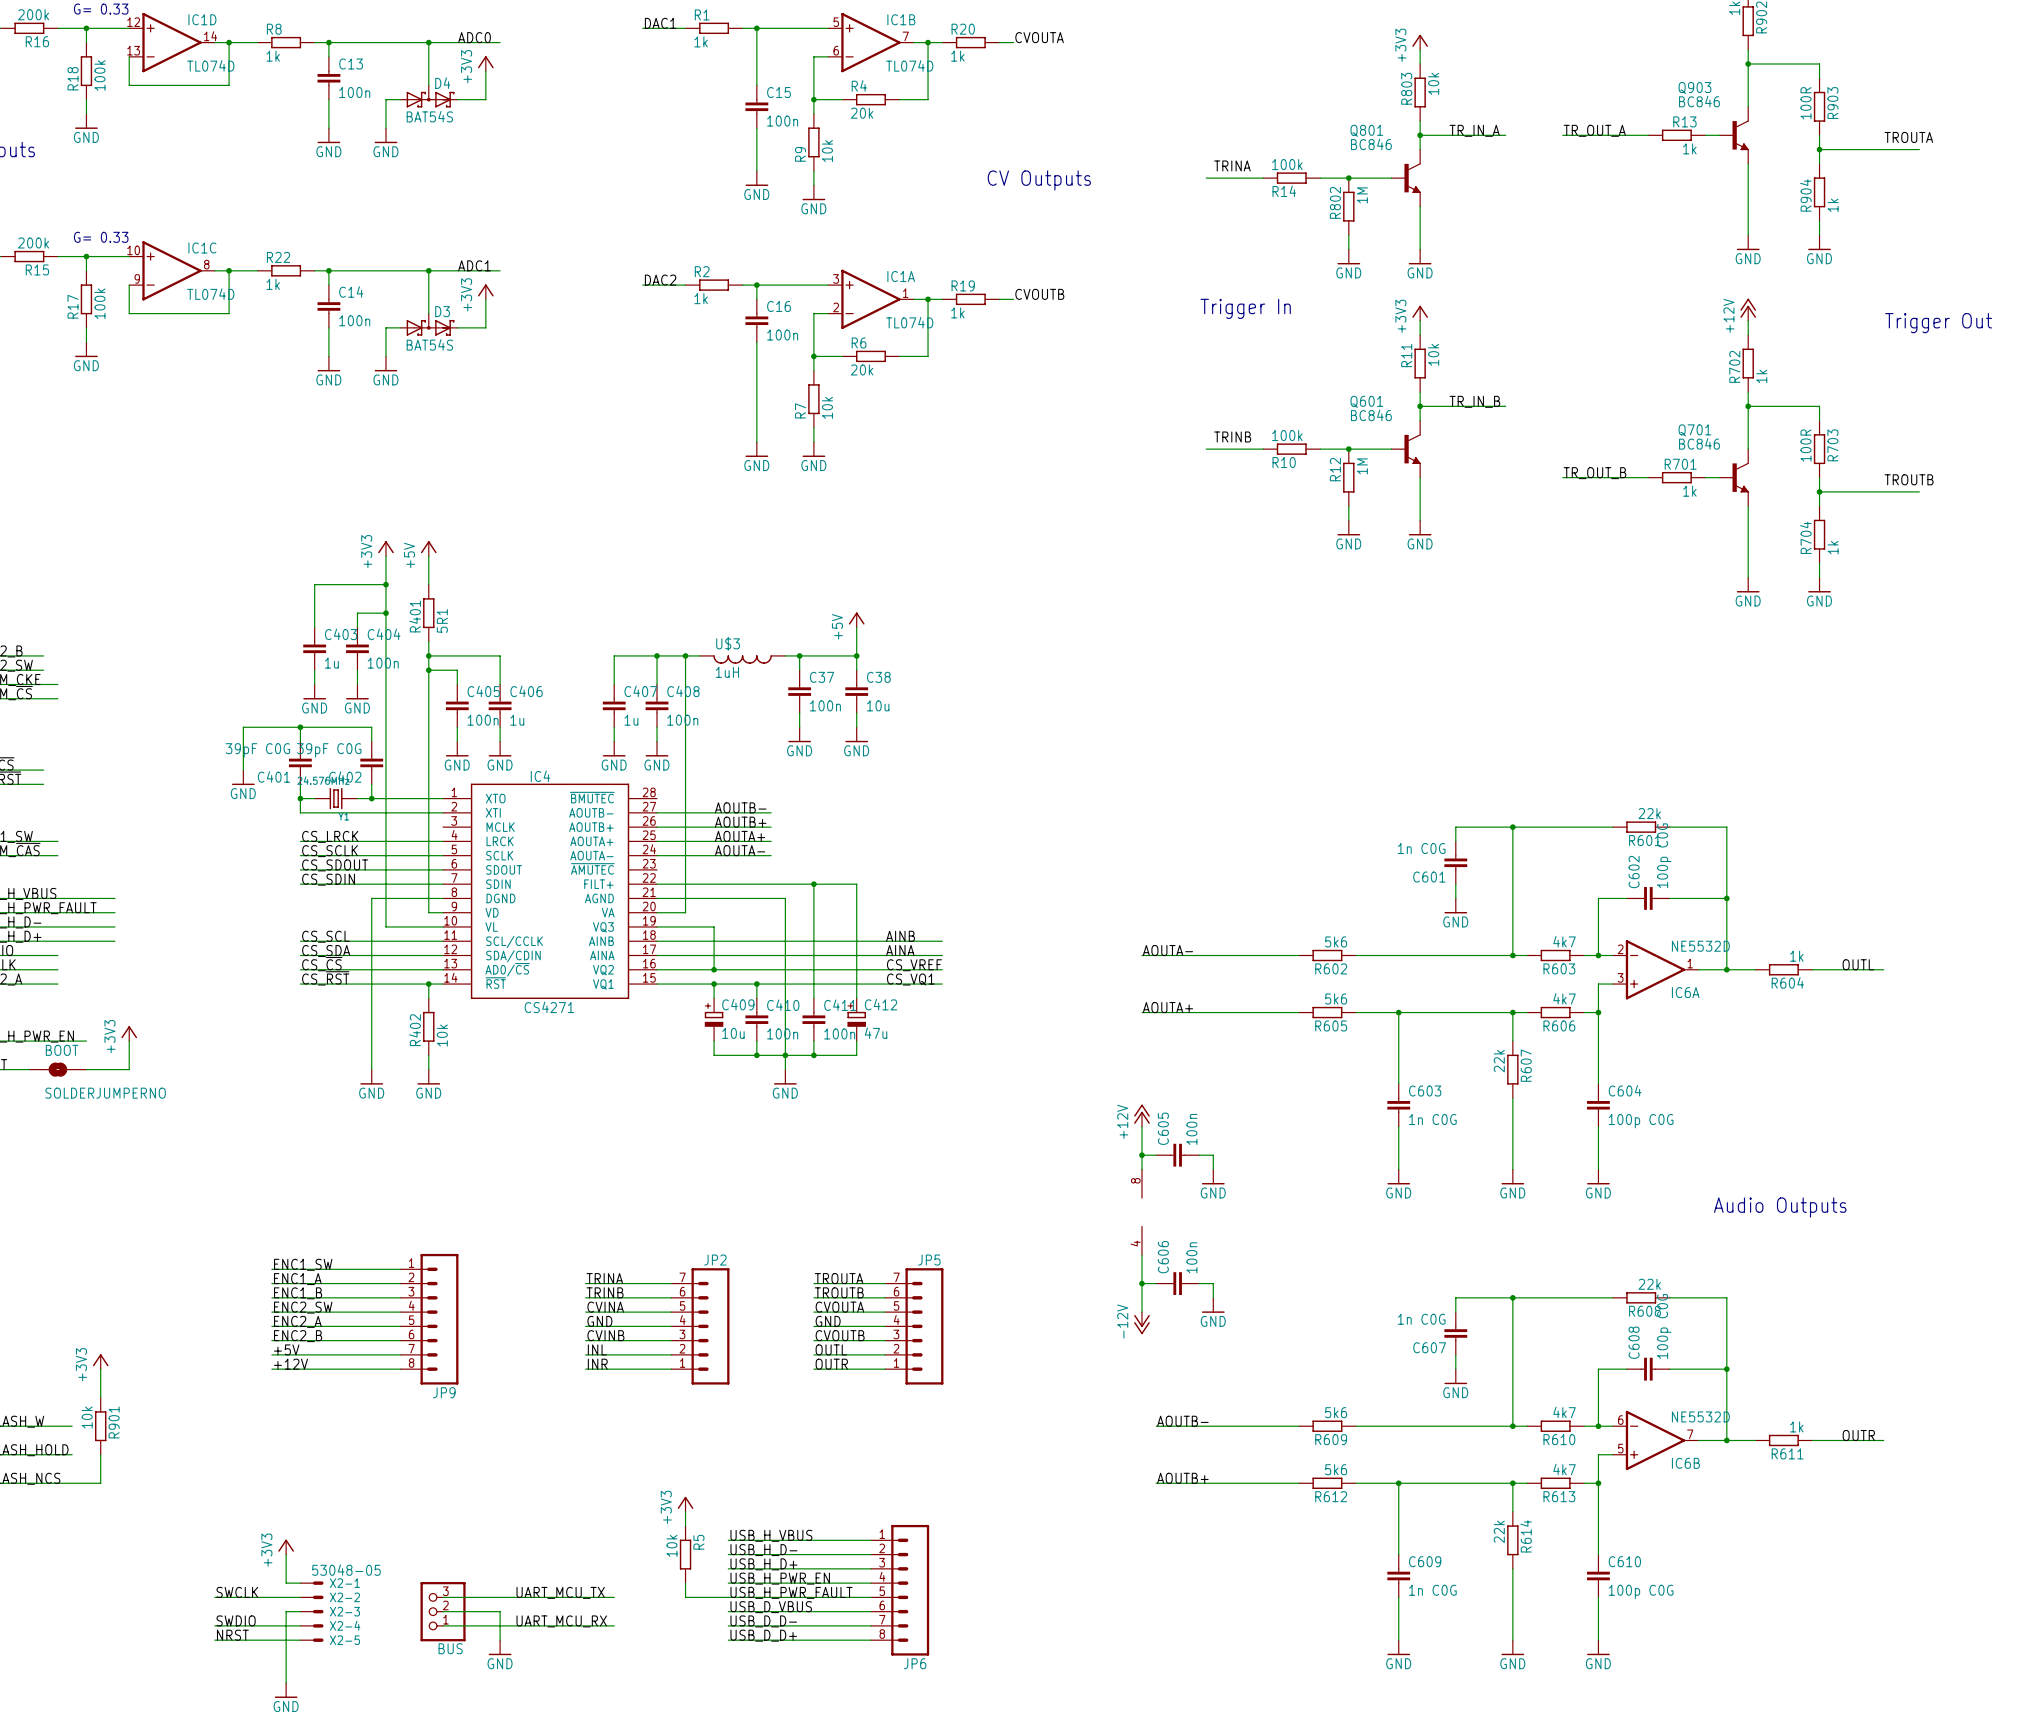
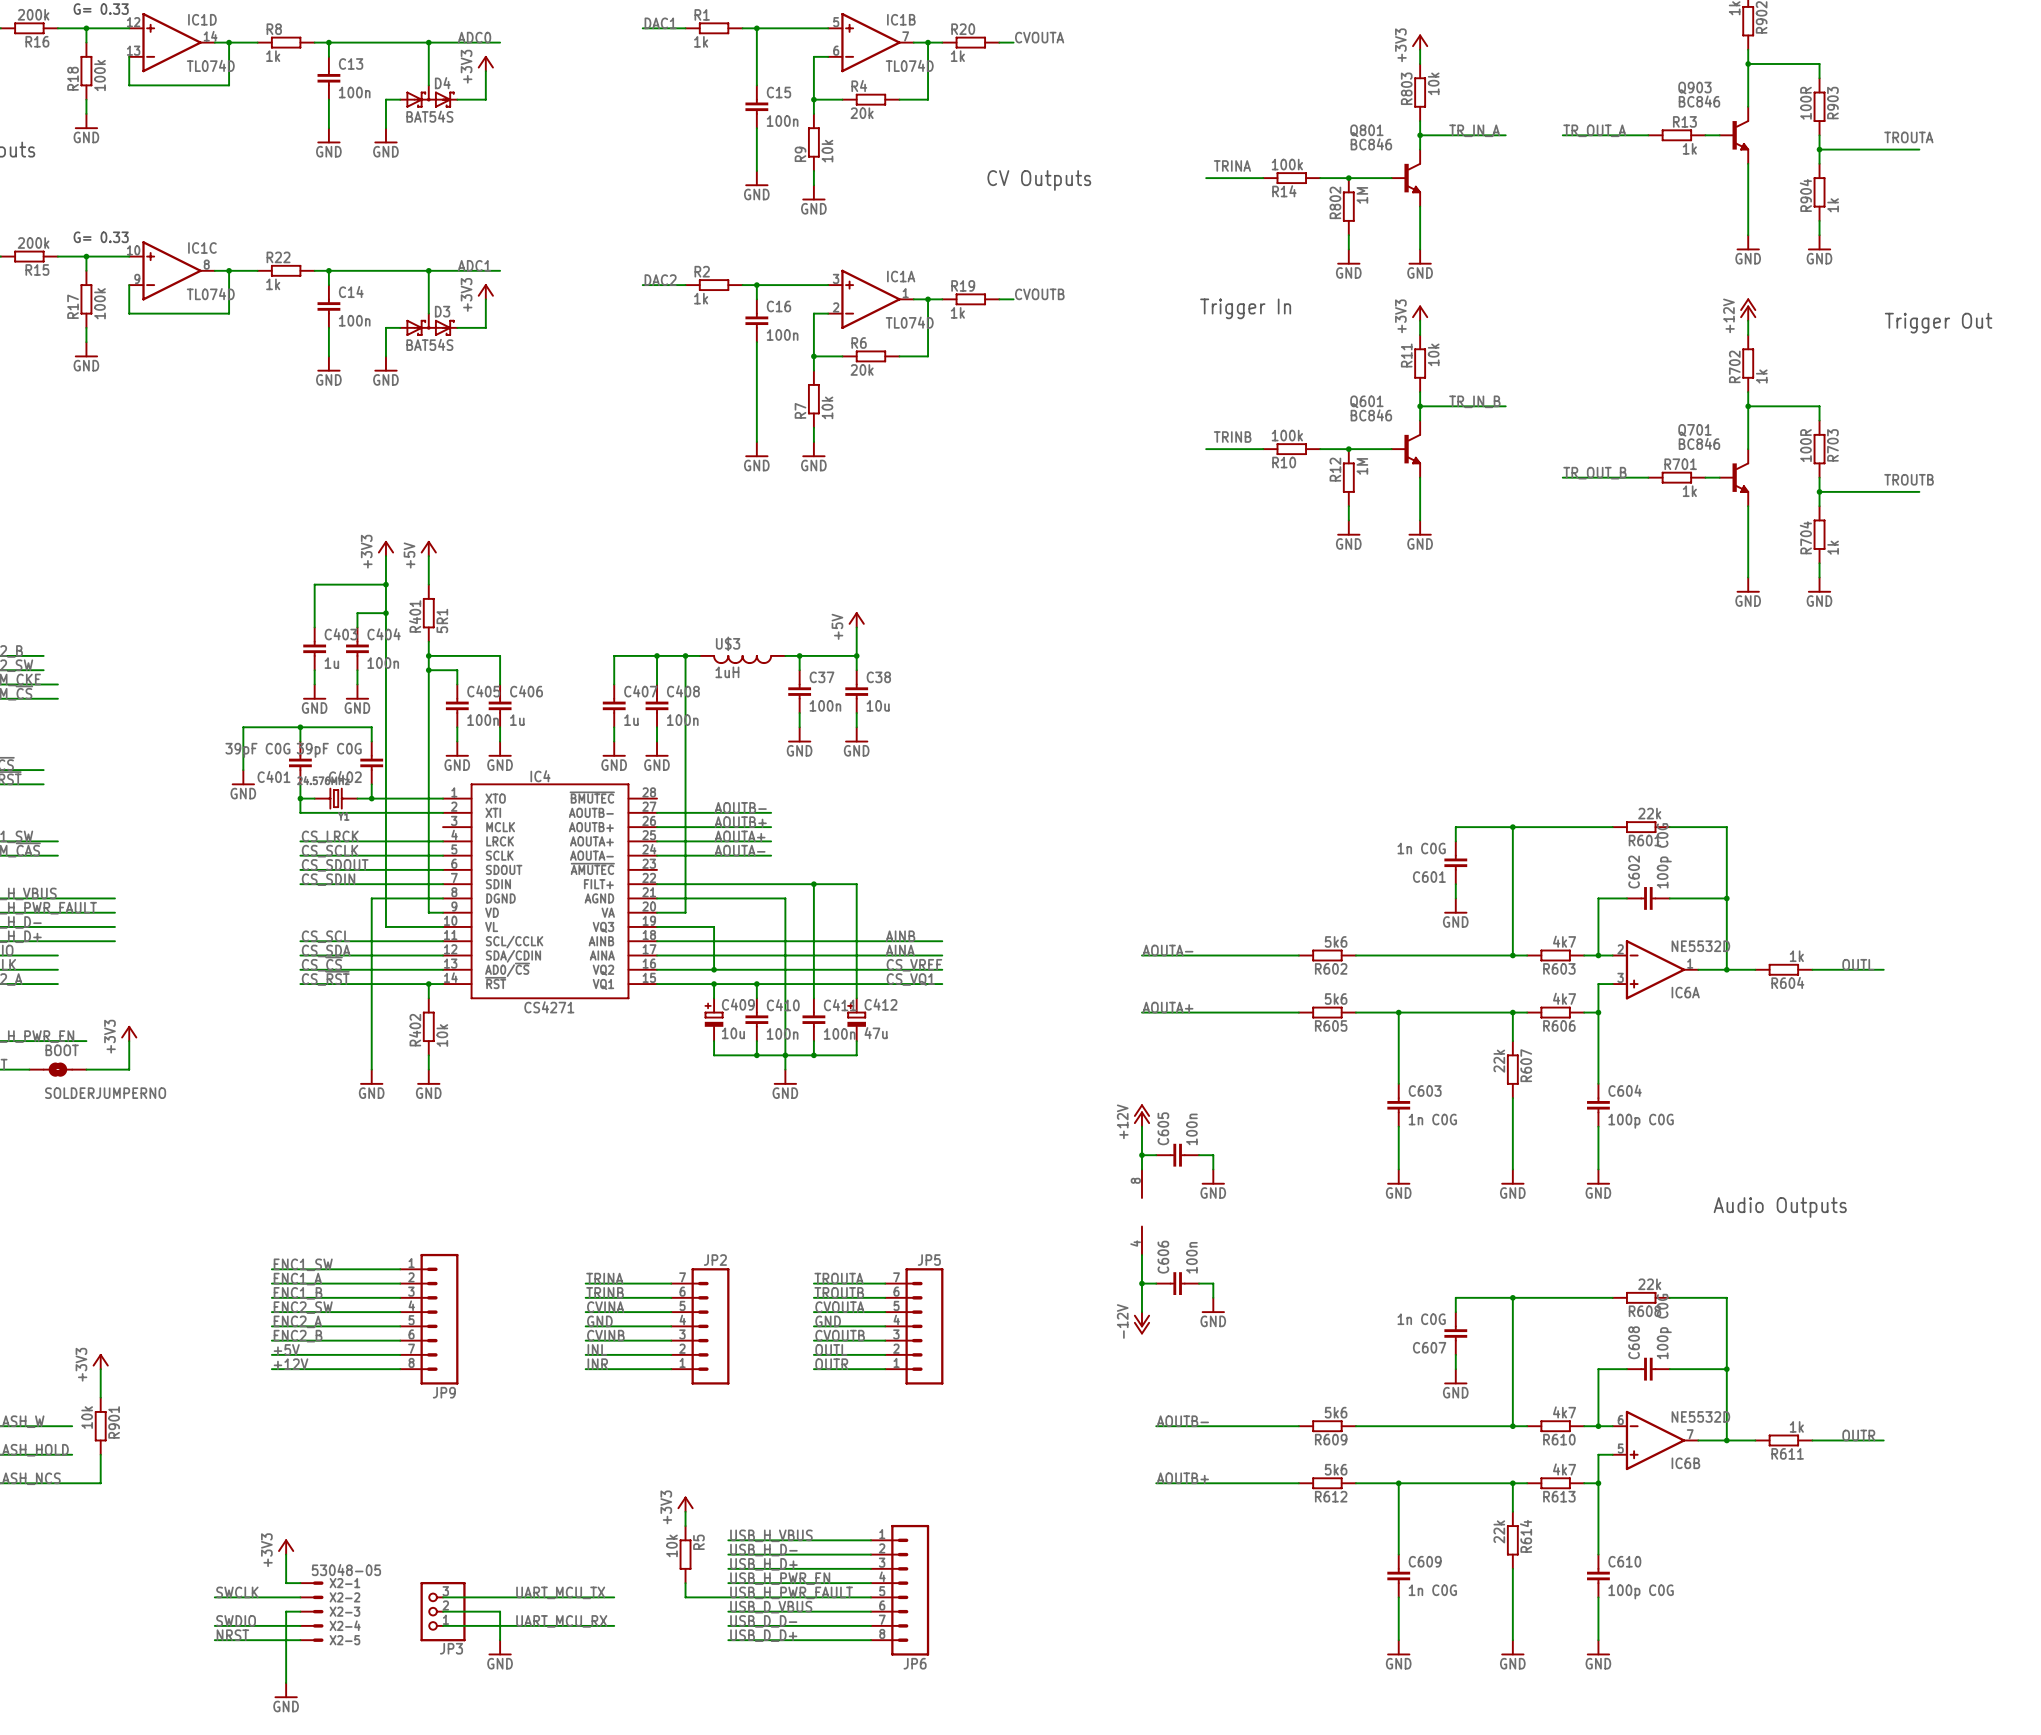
BUS name: BUS (450, 1648) -> JP3 (451, 1648)

